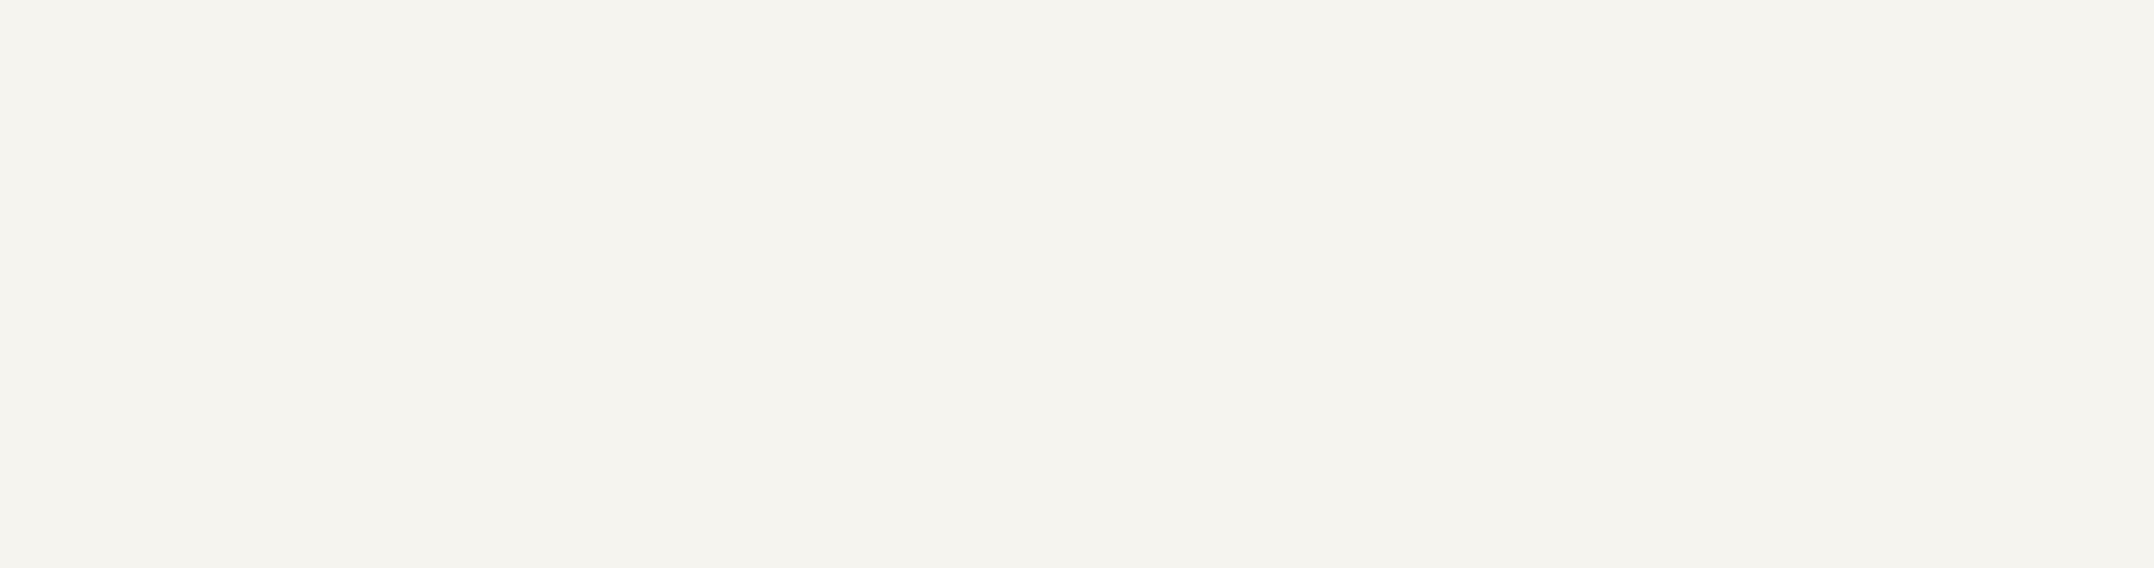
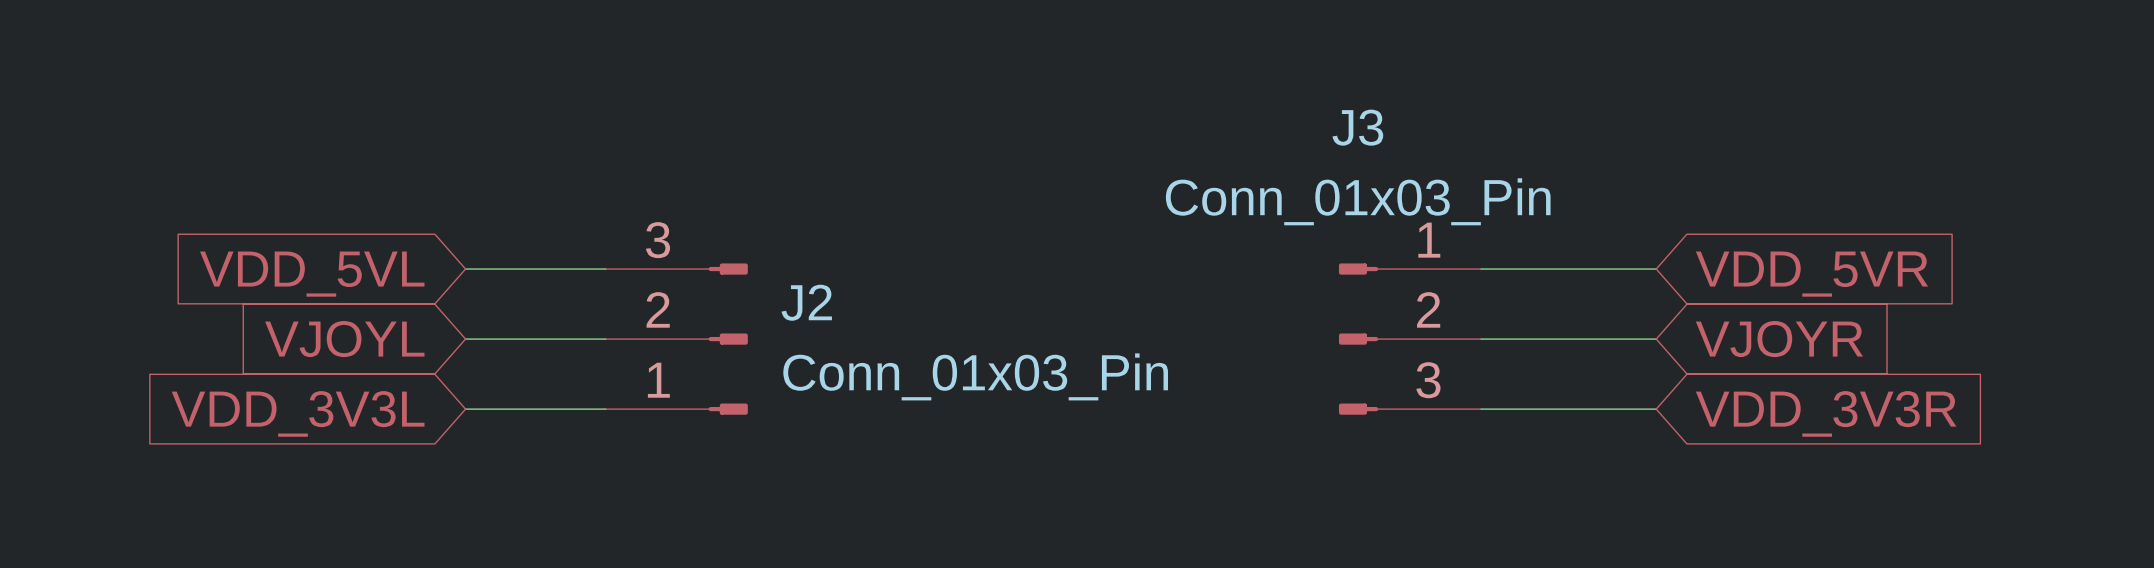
wire: none -> (465, 269) (605, 269)
wire: none -> (1481, 269) (1656, 269)
global label: none -> VDD_5VL (312, 274)
global label: none -> VDD_5VR (1811, 274)
global label: none -> VJOYL (344, 339)
wire: none -> (465, 339) (605, 339)
J2: none -> Conn_01x03_Pin (676, 339)
J3: none -> Conn_01x03_Pin (1410, 339)
wire: none -> (1481, 339) (1656, 339)
global label: none -> VJOYR (1779, 339)
wire: none -> (465, 409) (605, 409)
wire: none -> (1481, 409) (1656, 409)
global label: none -> VDD_3V3L (298, 413)
global label: none -> VDD_3V3R (1826, 413)

